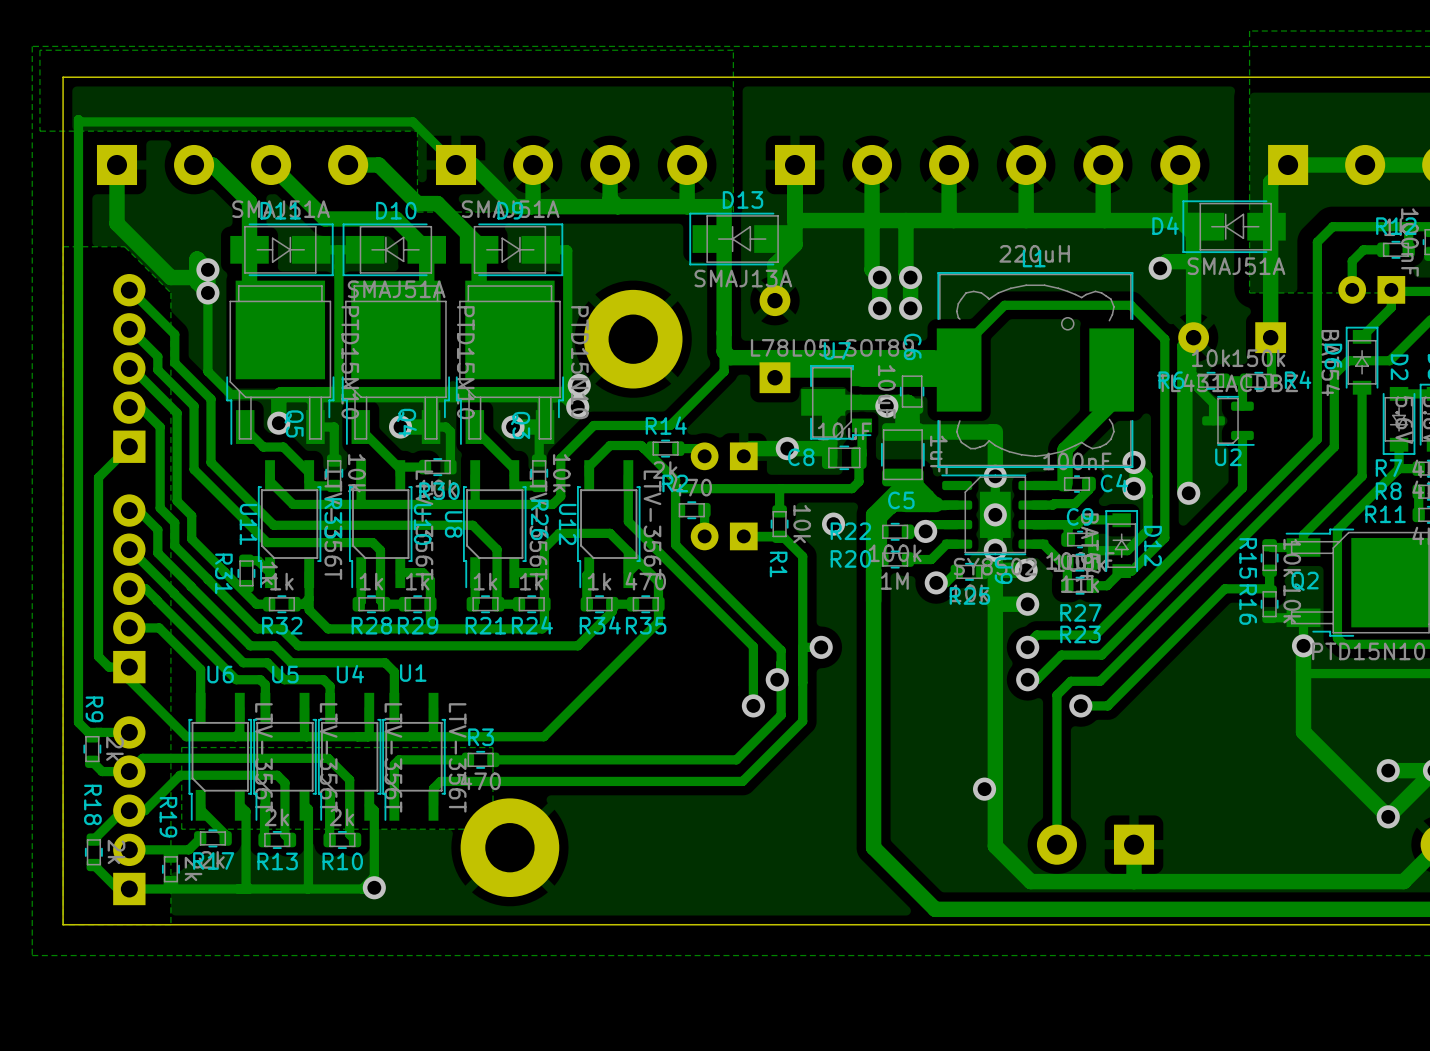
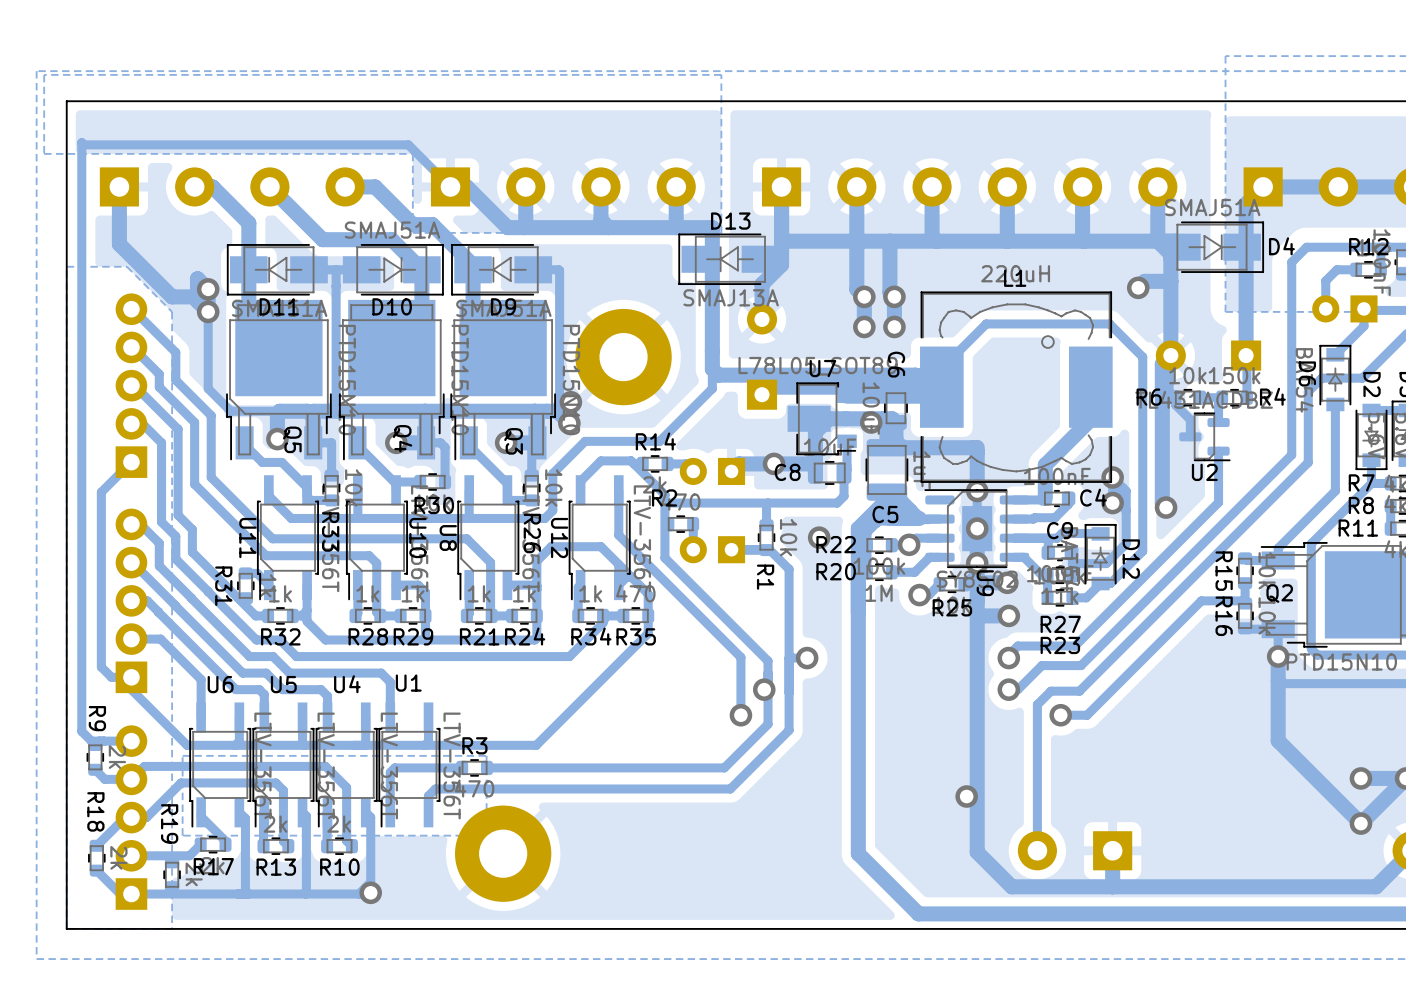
D4 rotation: 0° (1234, 226) -> 180° (1213, 247)
D11 rotation: 0° (281, 249) -> 180° (277, 269)
D10 rotation: 0° (394, 249) -> 180° (393, 269)
D9 rotation: 0° (511, 249) -> 180° (501, 269)

